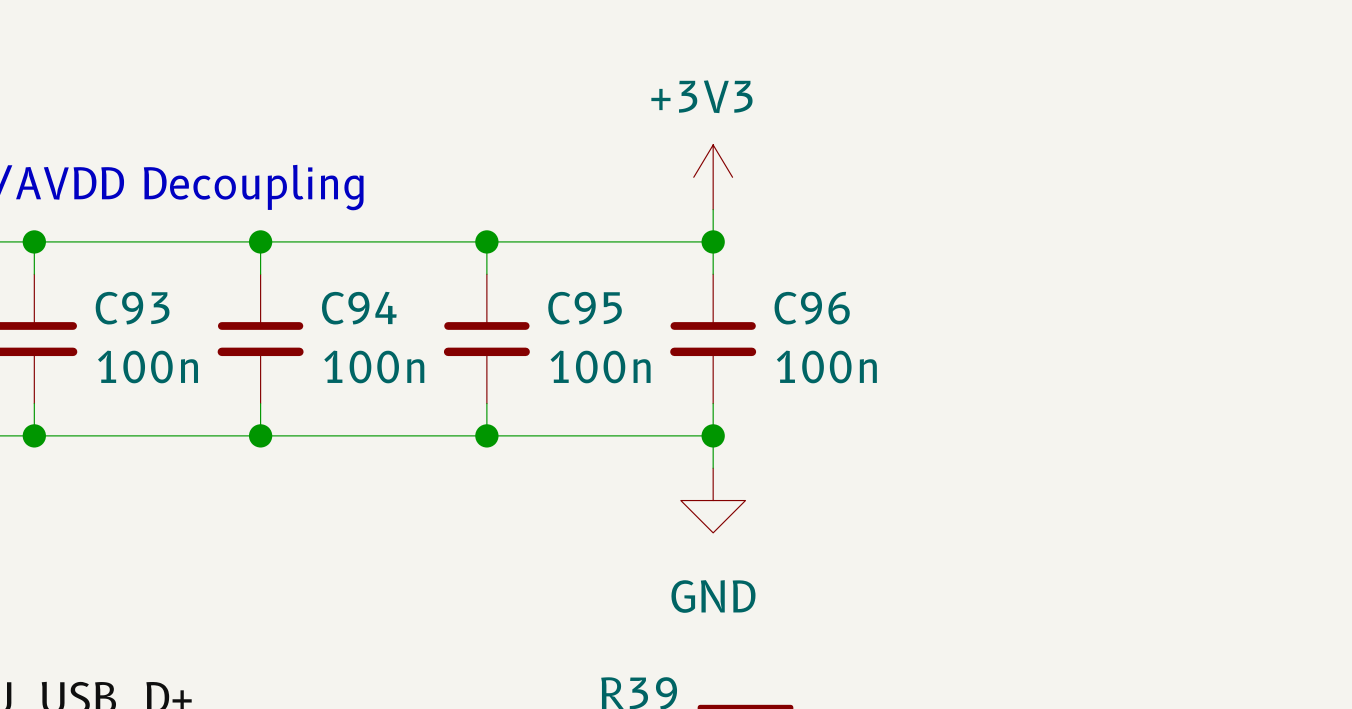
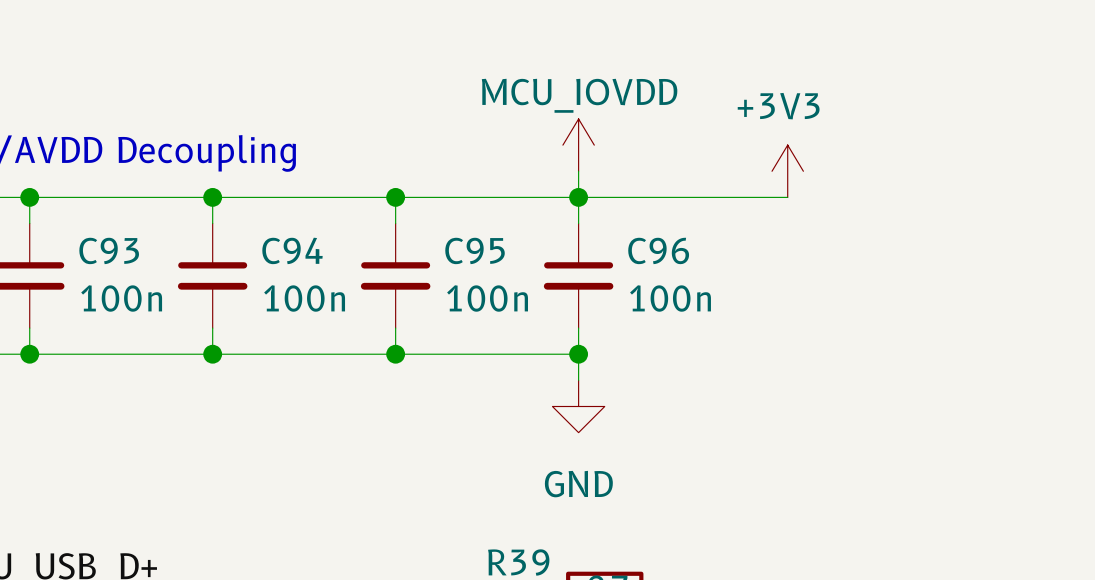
power symbol: +3V3 (713, 177) -> MCU_IOVDD (578, 145)
power symbol: none -> +3V3 (787, 171)
wire: none -> (578, 197) (787, 197)

